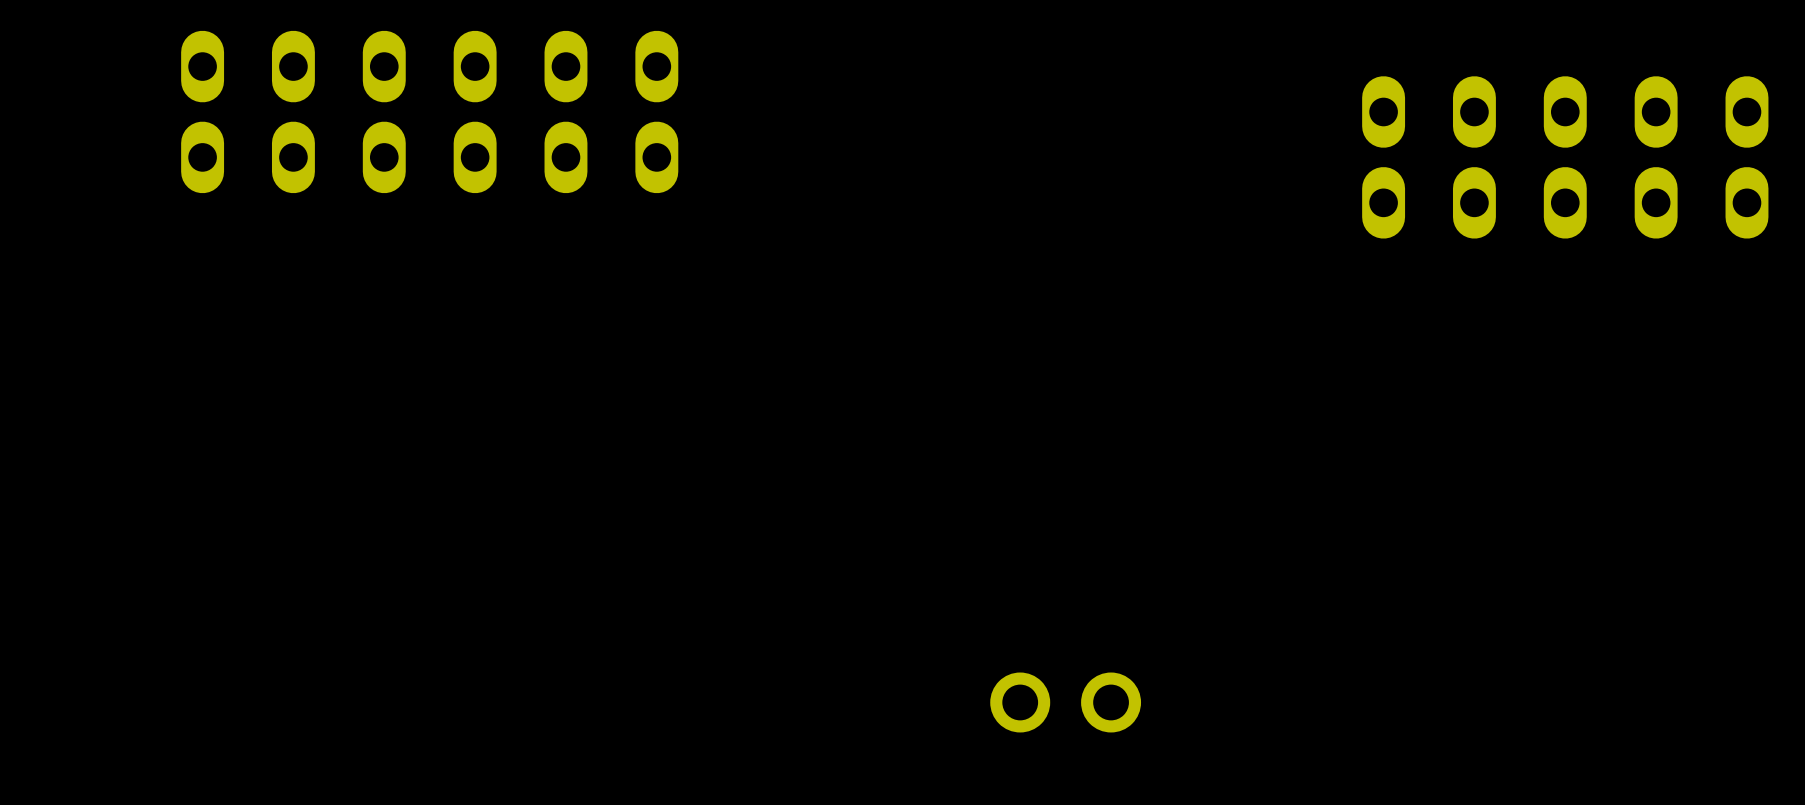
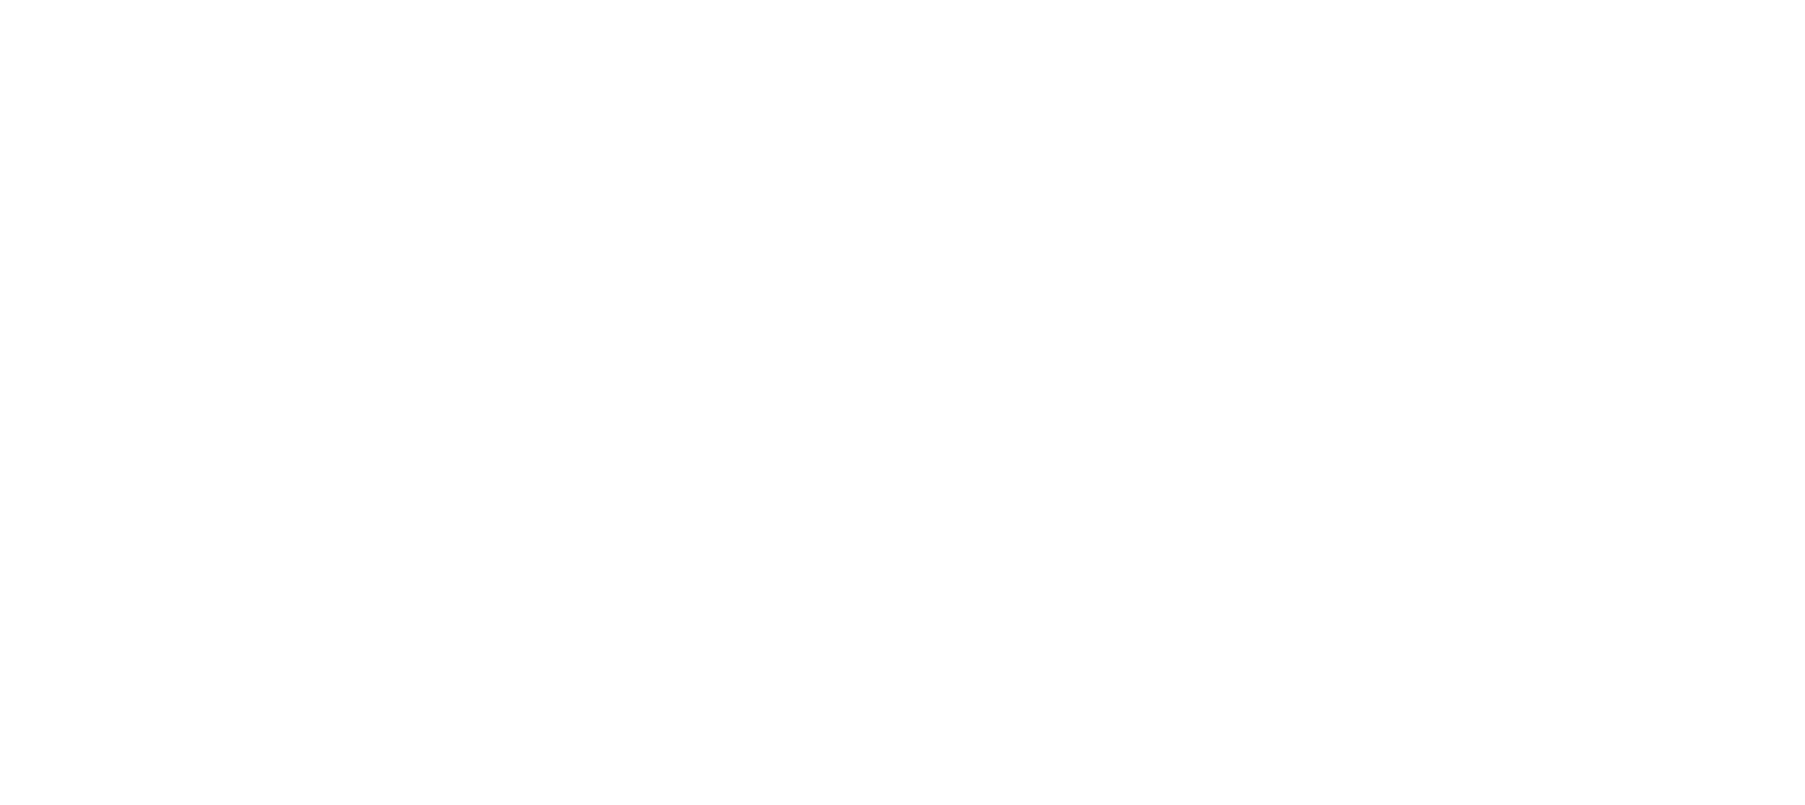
part: (429, 111) -> none
part: (1565, 157) -> none
part: (1065, 702) -> none

